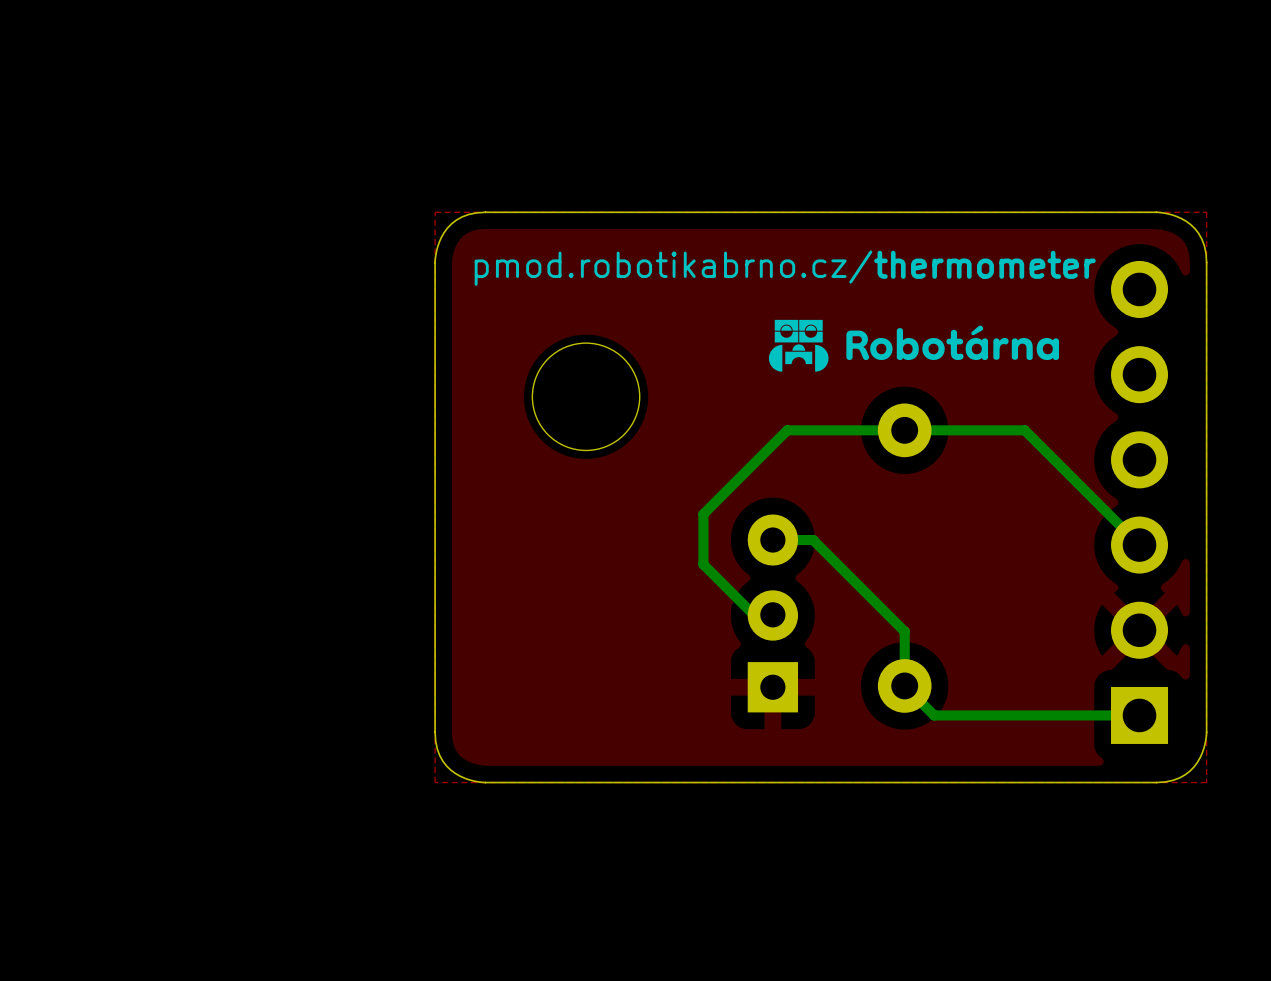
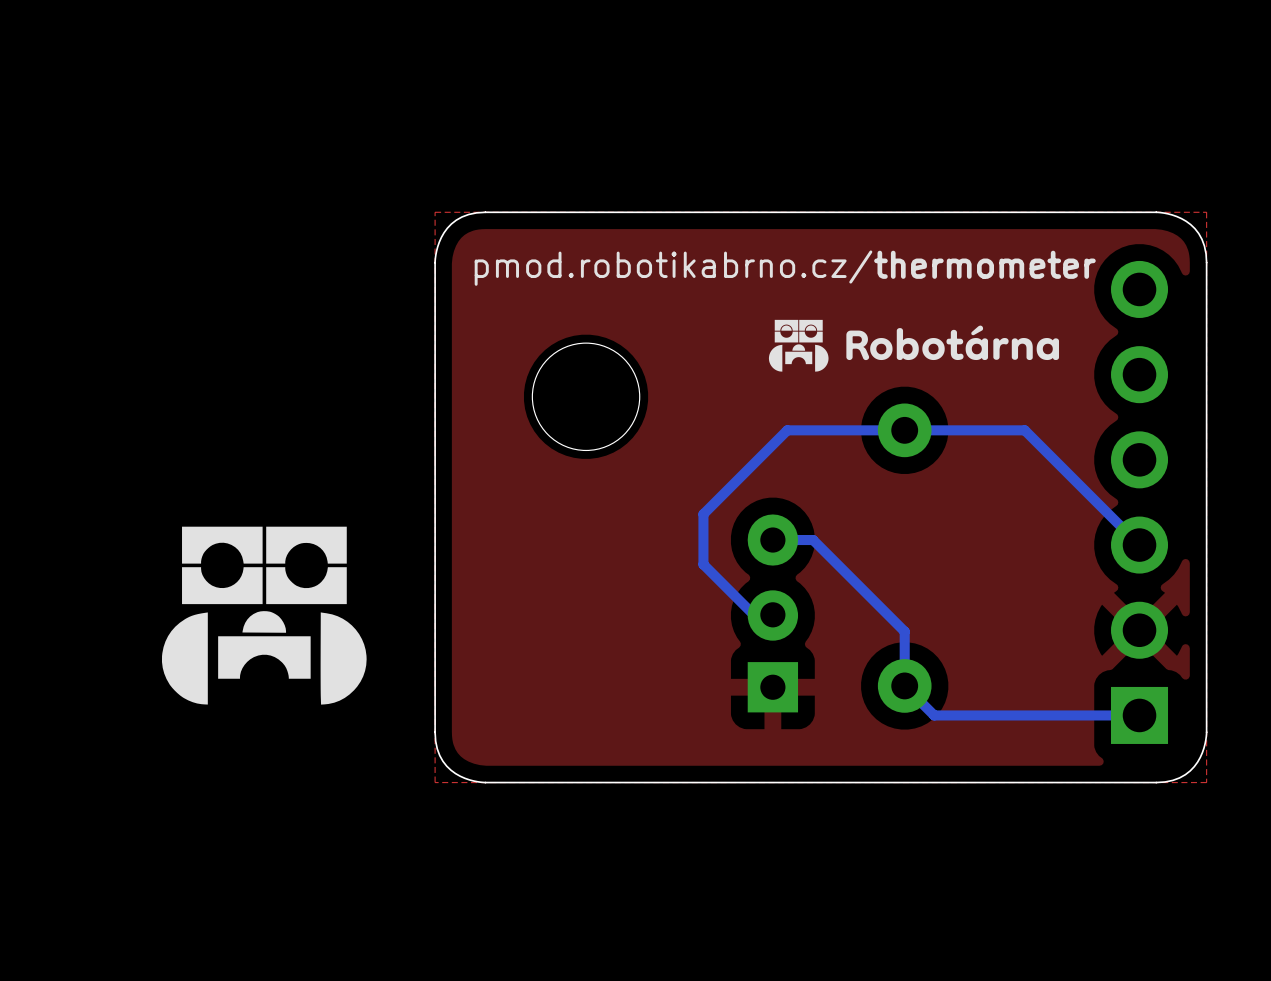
drawing: none -> [161, 526, 367, 705]

